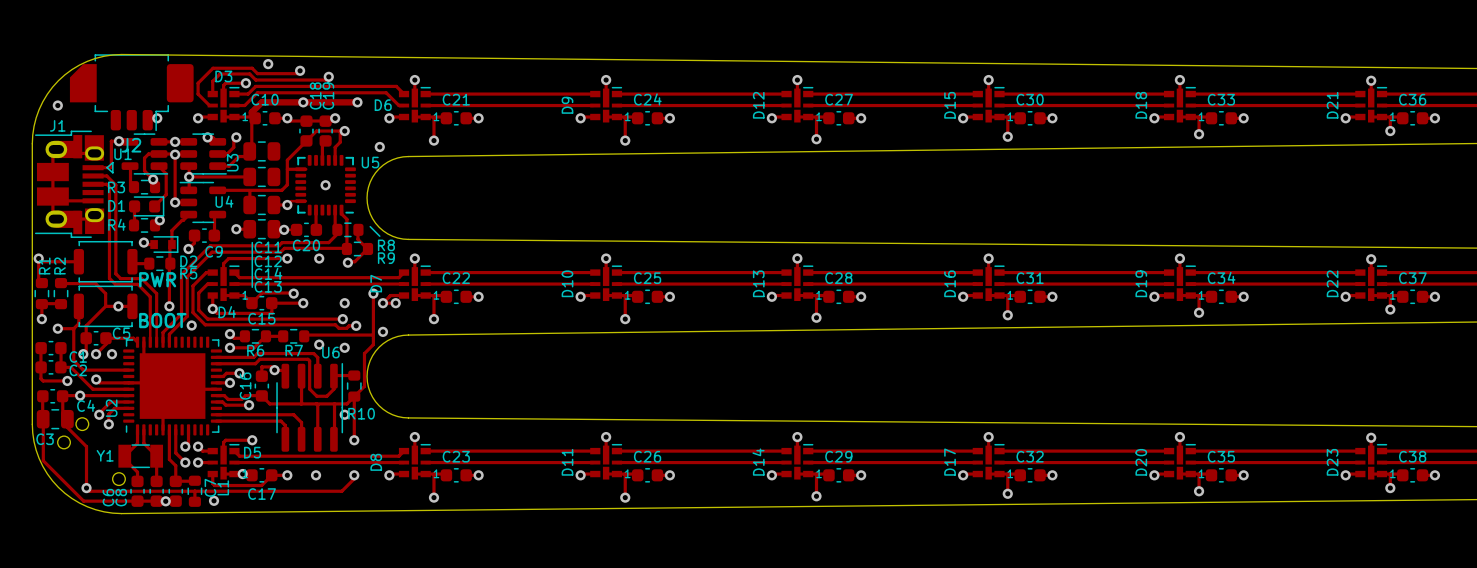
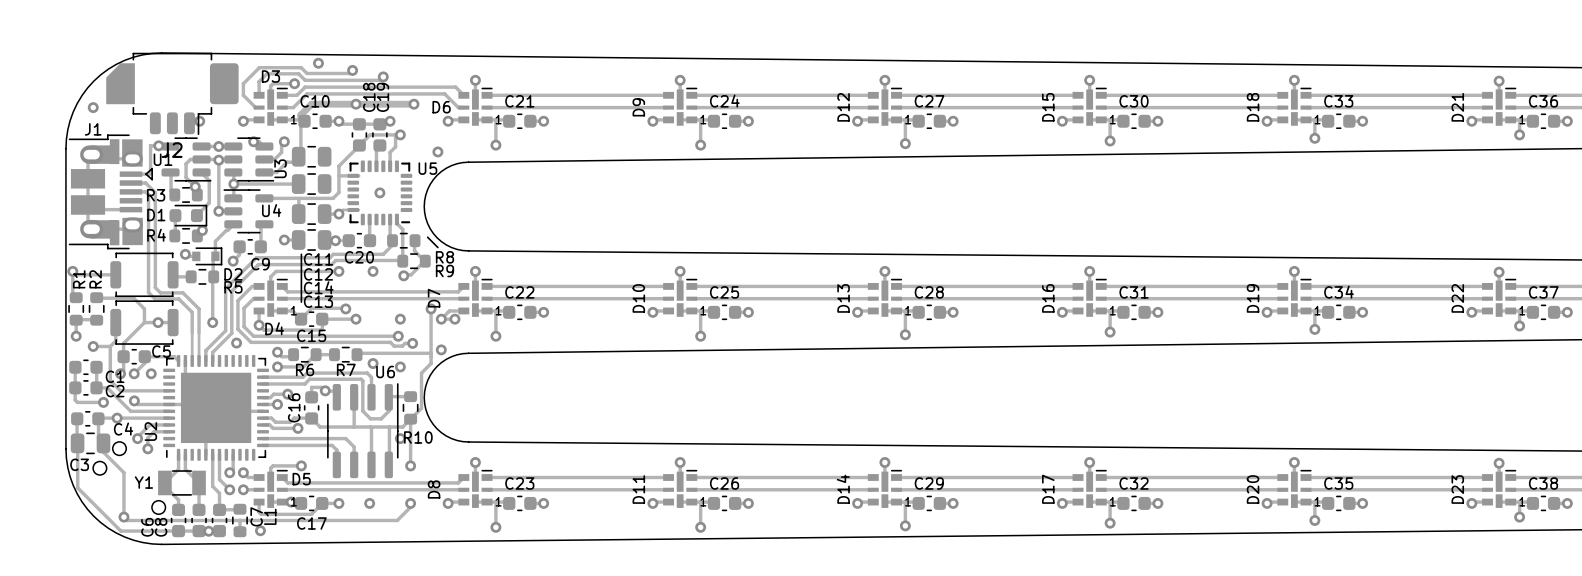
text: PWR (157, 279) -> none
text: BOOT (162, 320) -> none

